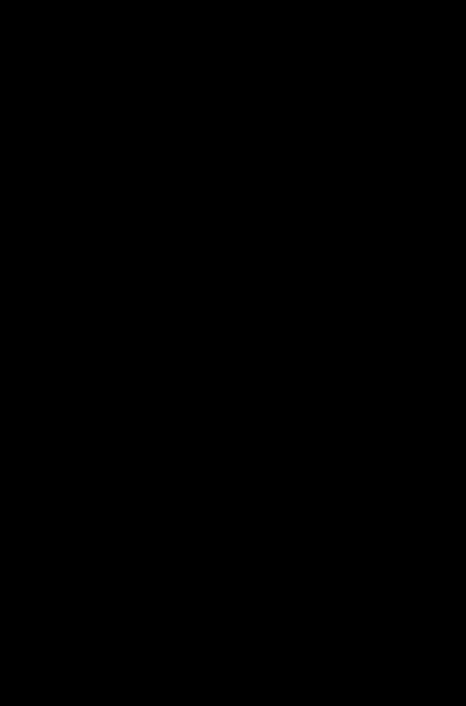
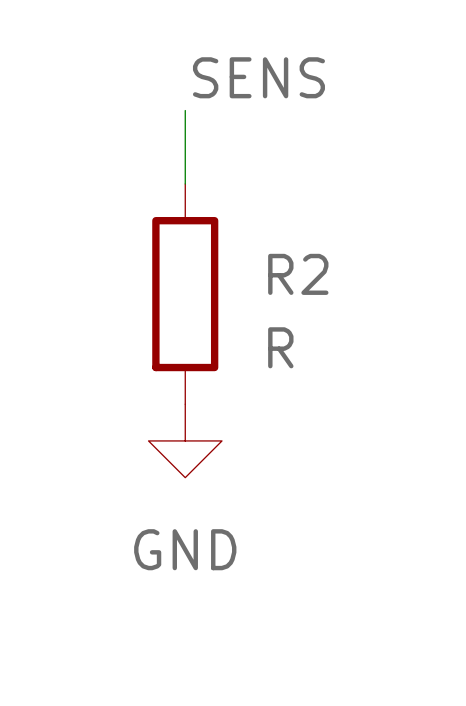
label: none -> SENS (258, 77)
wire: none -> (185, 110) (185, 183)
R2: none -> R (185, 294)
power symbol: none -> GND (185, 440)

